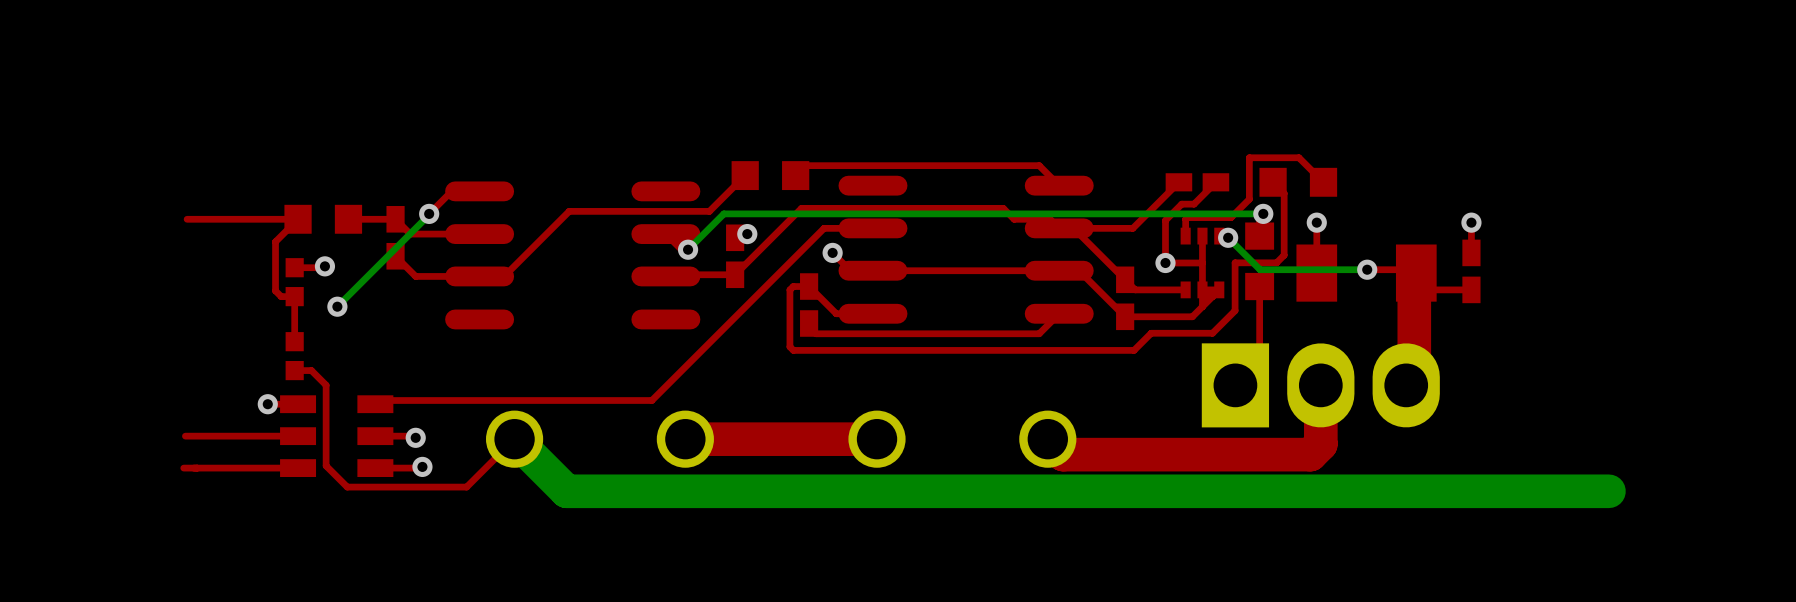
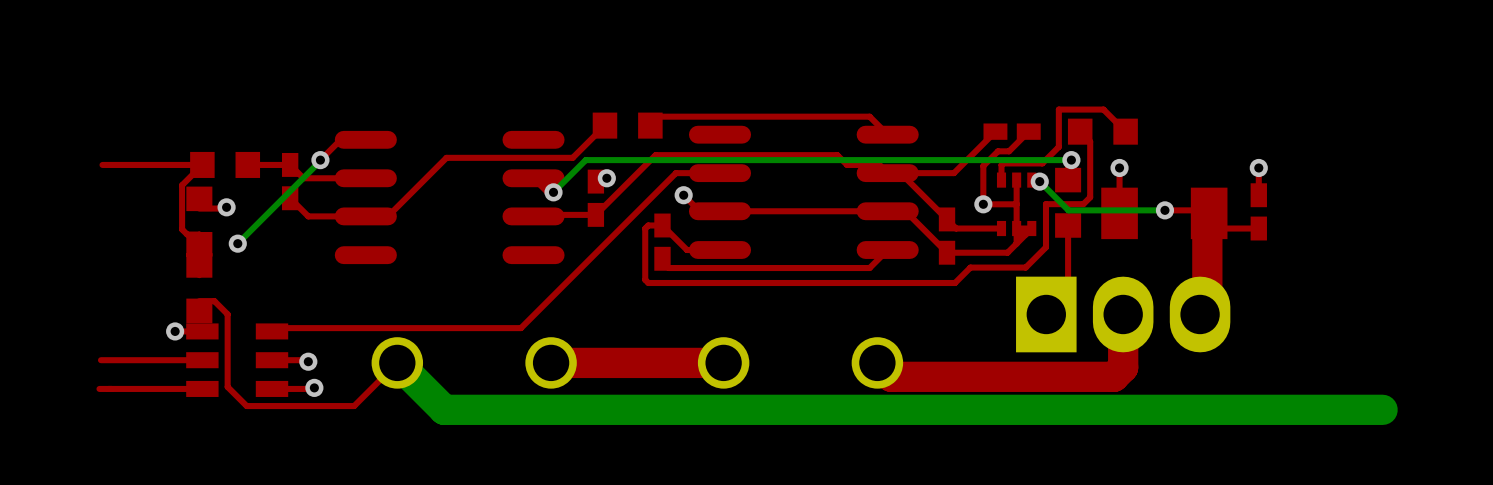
part footprint: [285, 258, 304, 307] -> [186, 186, 213, 257]
part footprint: [285, 332, 304, 381] -> [186, 253, 213, 324]

